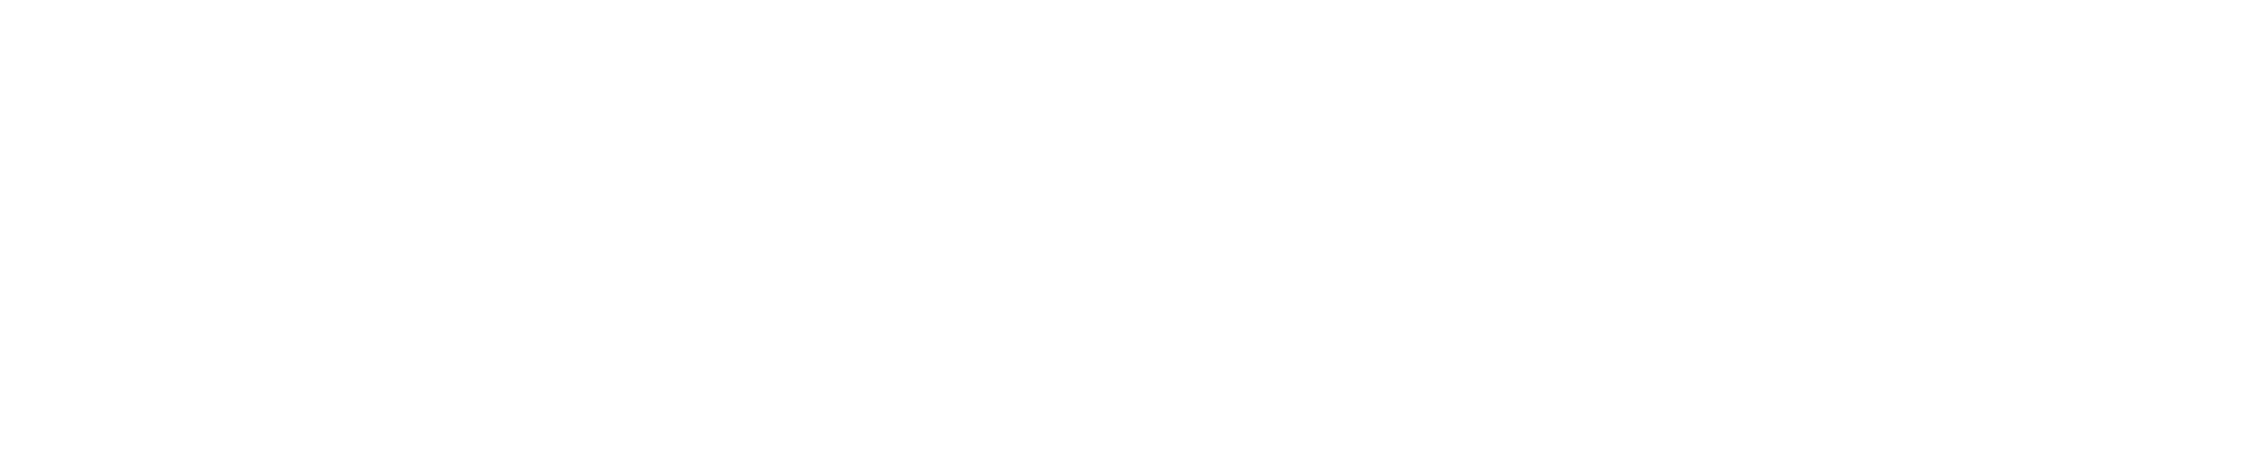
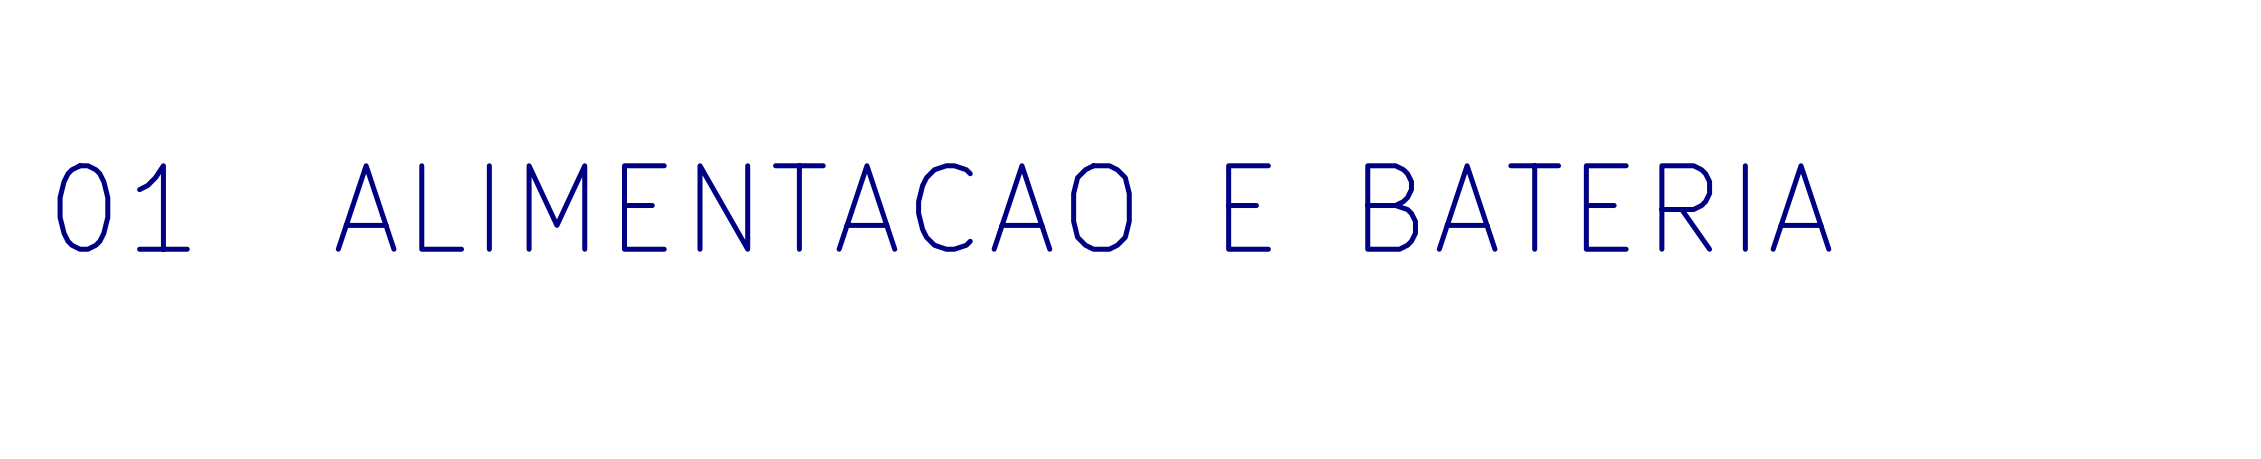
text: none -> 01 ALIMENTACAO E BATERIA (944, 207)

